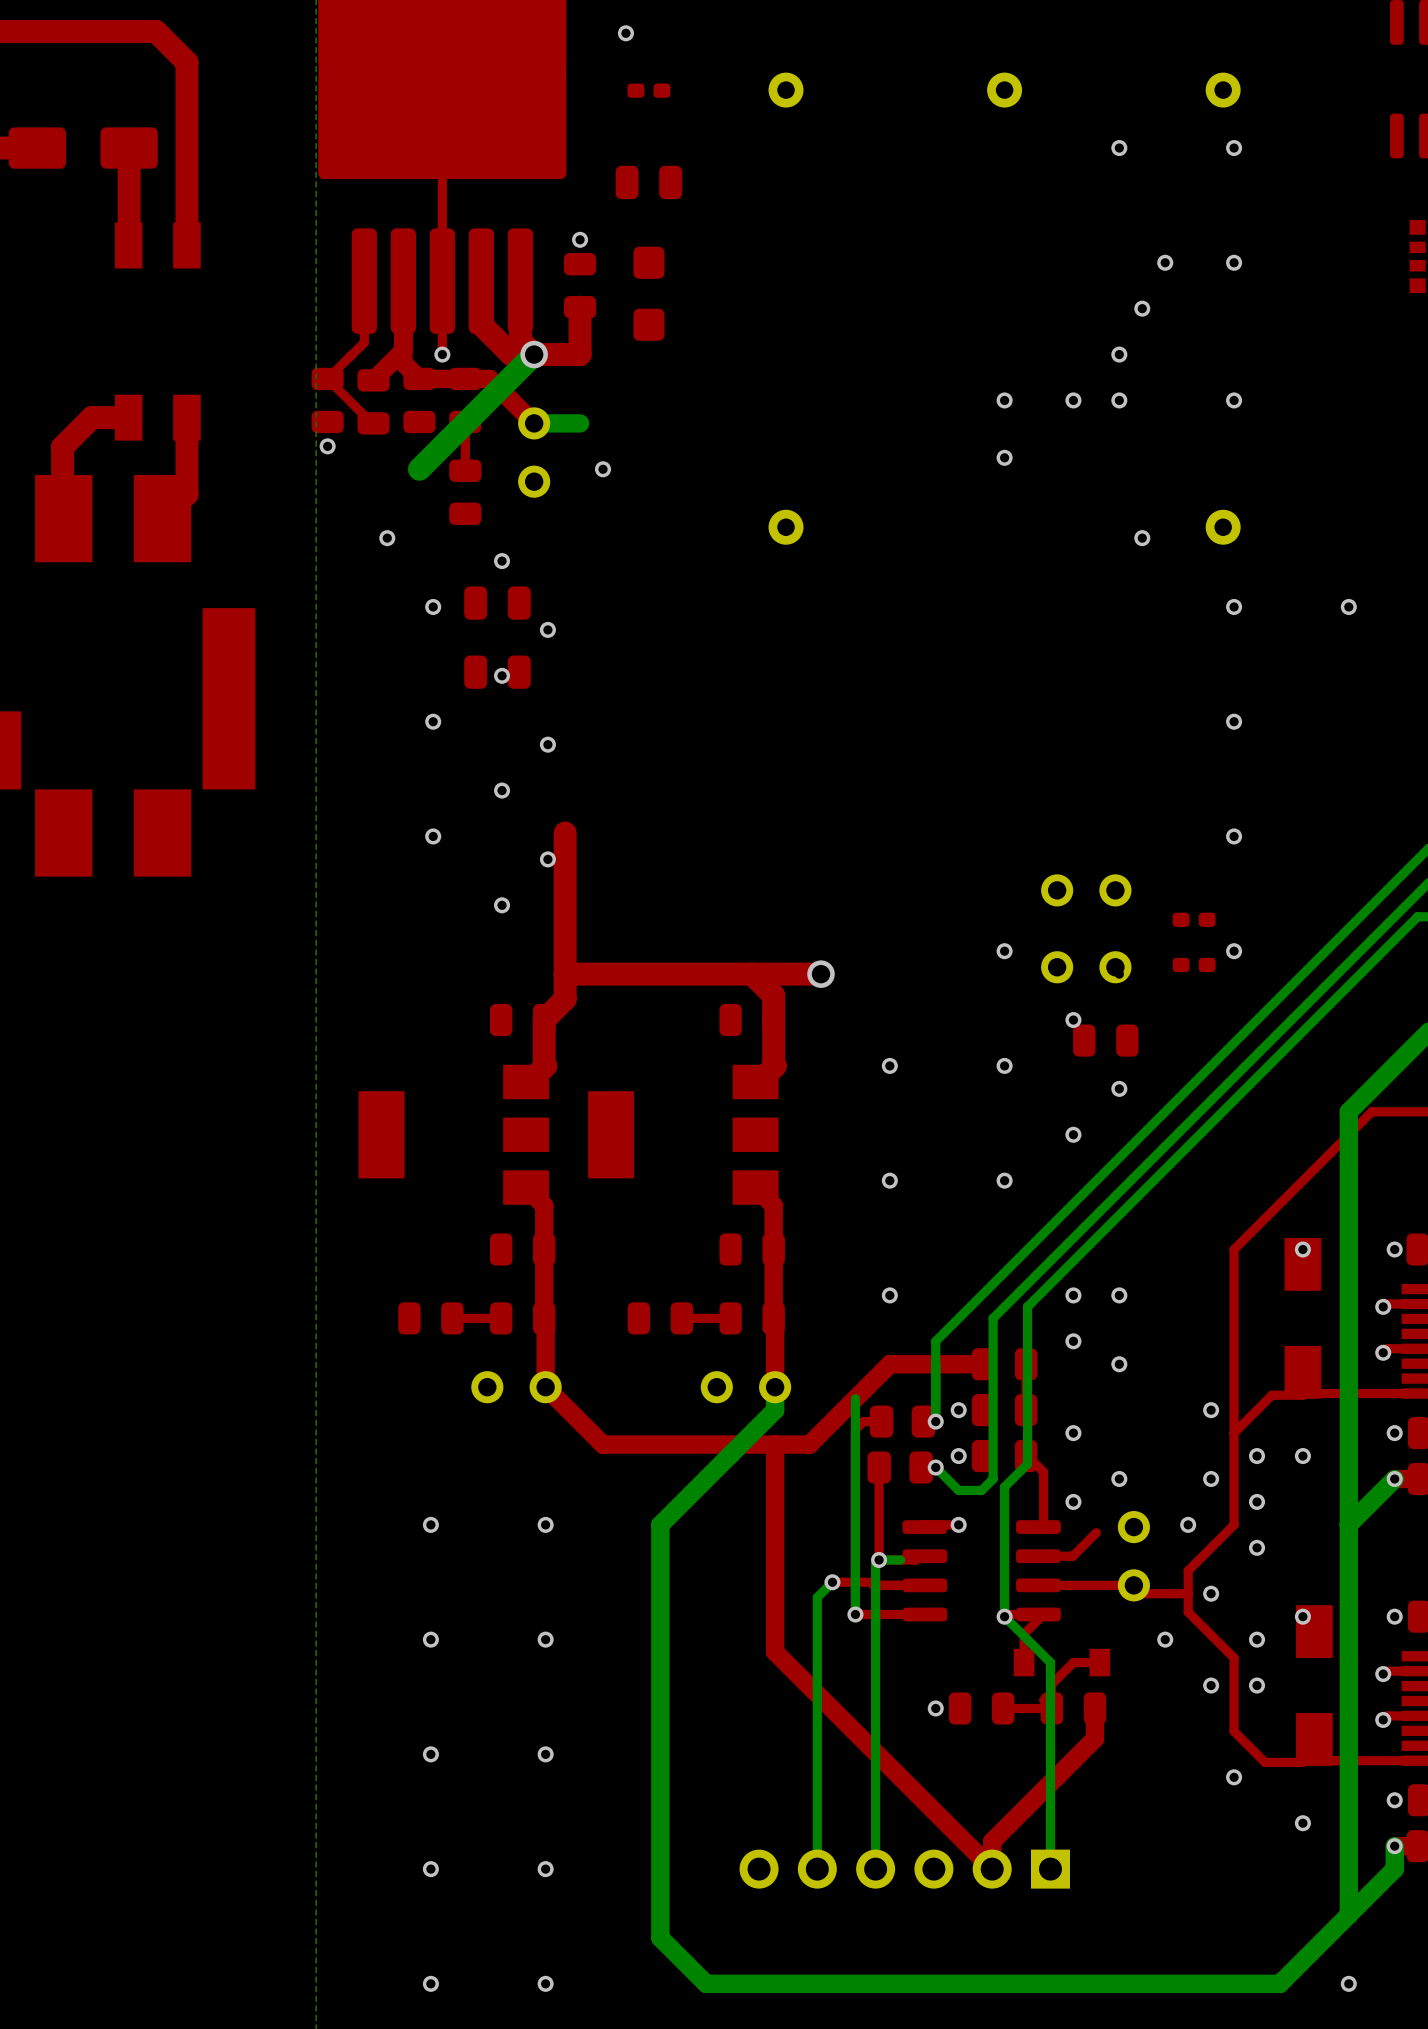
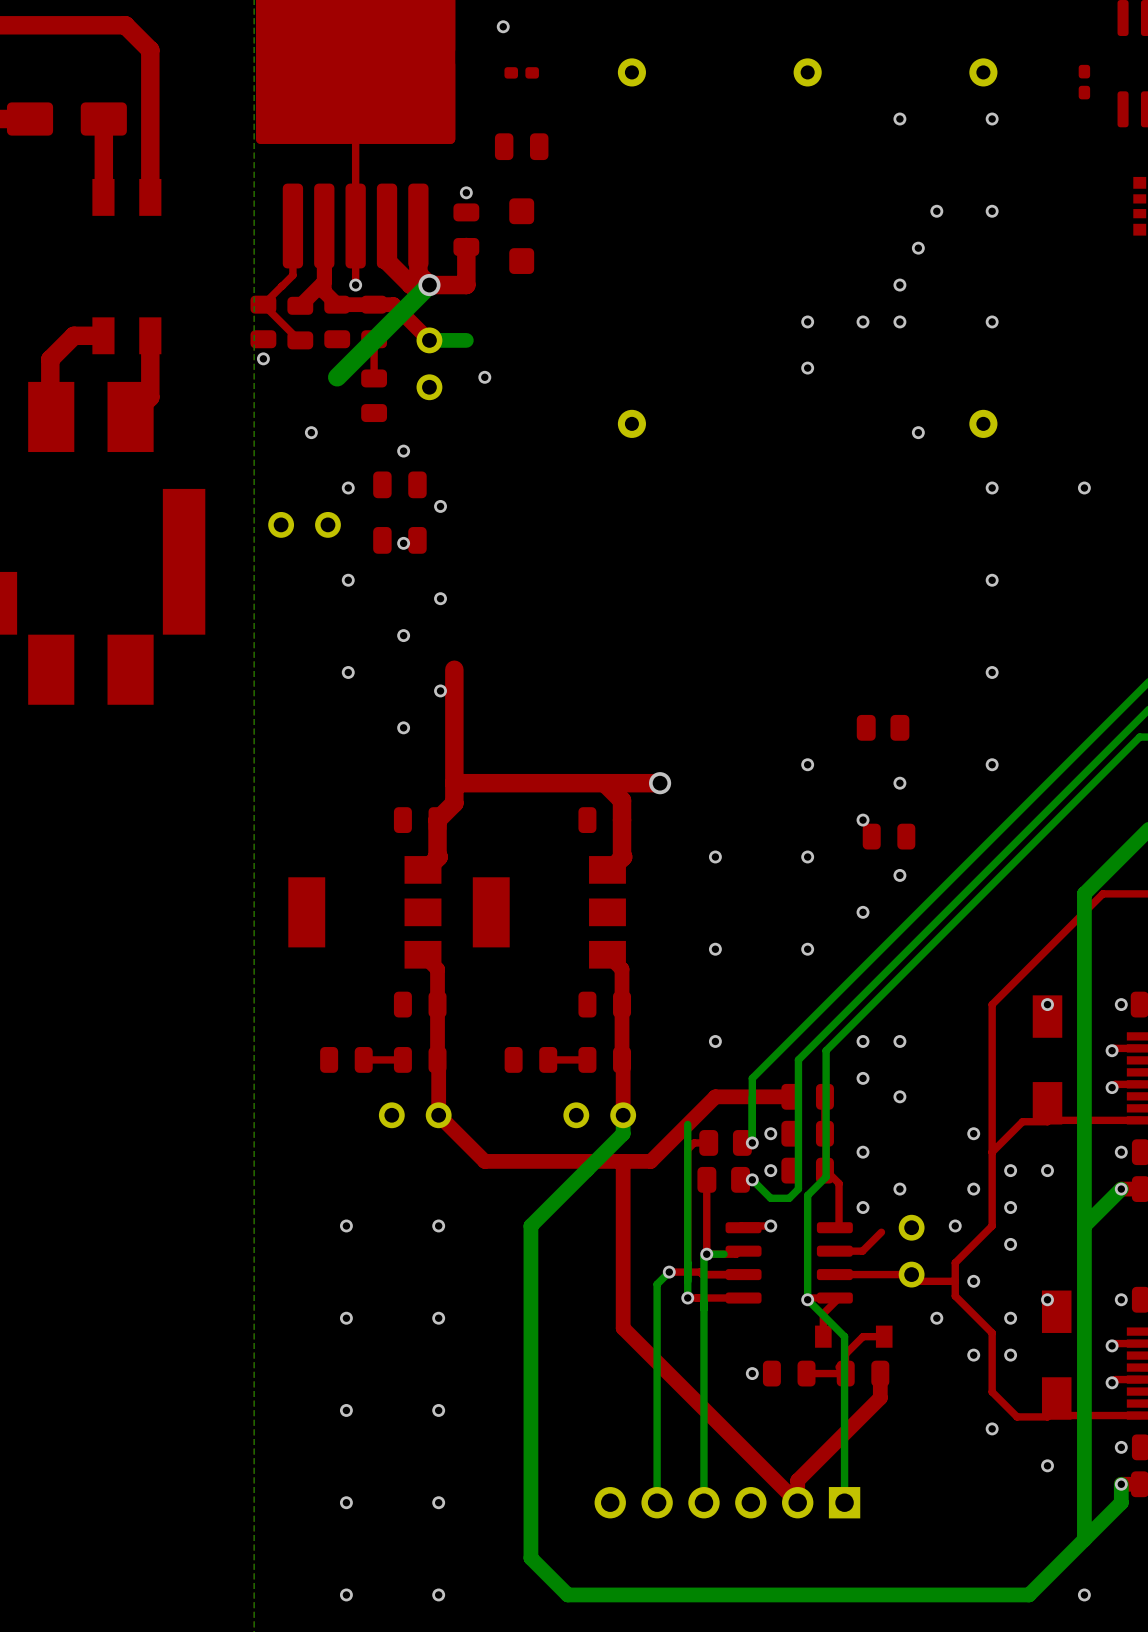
part: none -> (1084, 82)
part: none -> (304, 524)
part footprint: [1041, 874, 1132, 907] -> [856, 714, 910, 741]
part: (1194, 919) -> none
part: (1194, 964) -> none
part: (1086, 967) -> none

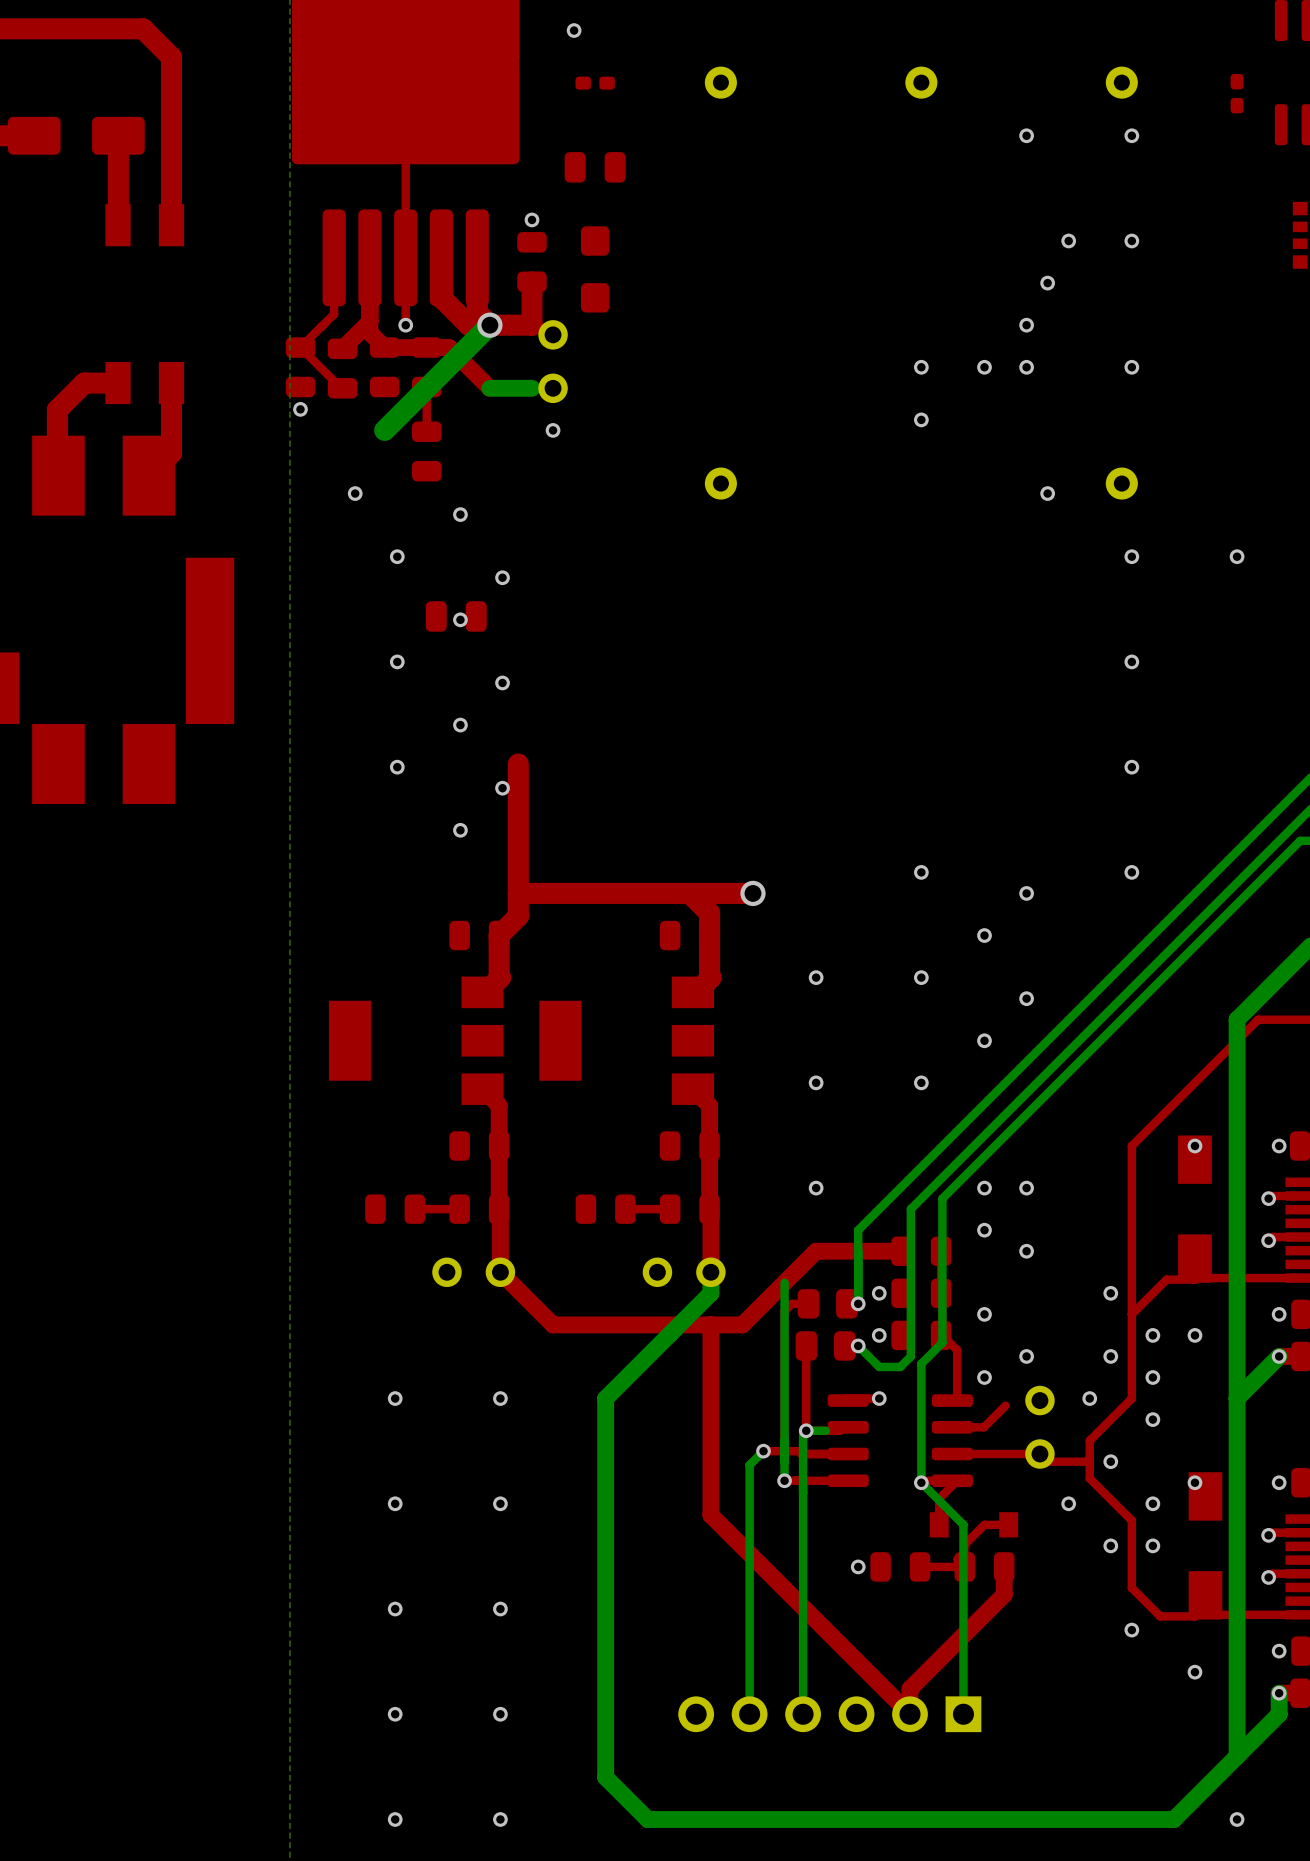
part position: (429, 363) -> (553, 361)
part: (399, 484) -> none
part: (304, 524) -> none
part: (883, 727) -> none
part: (889, 836) -> none

